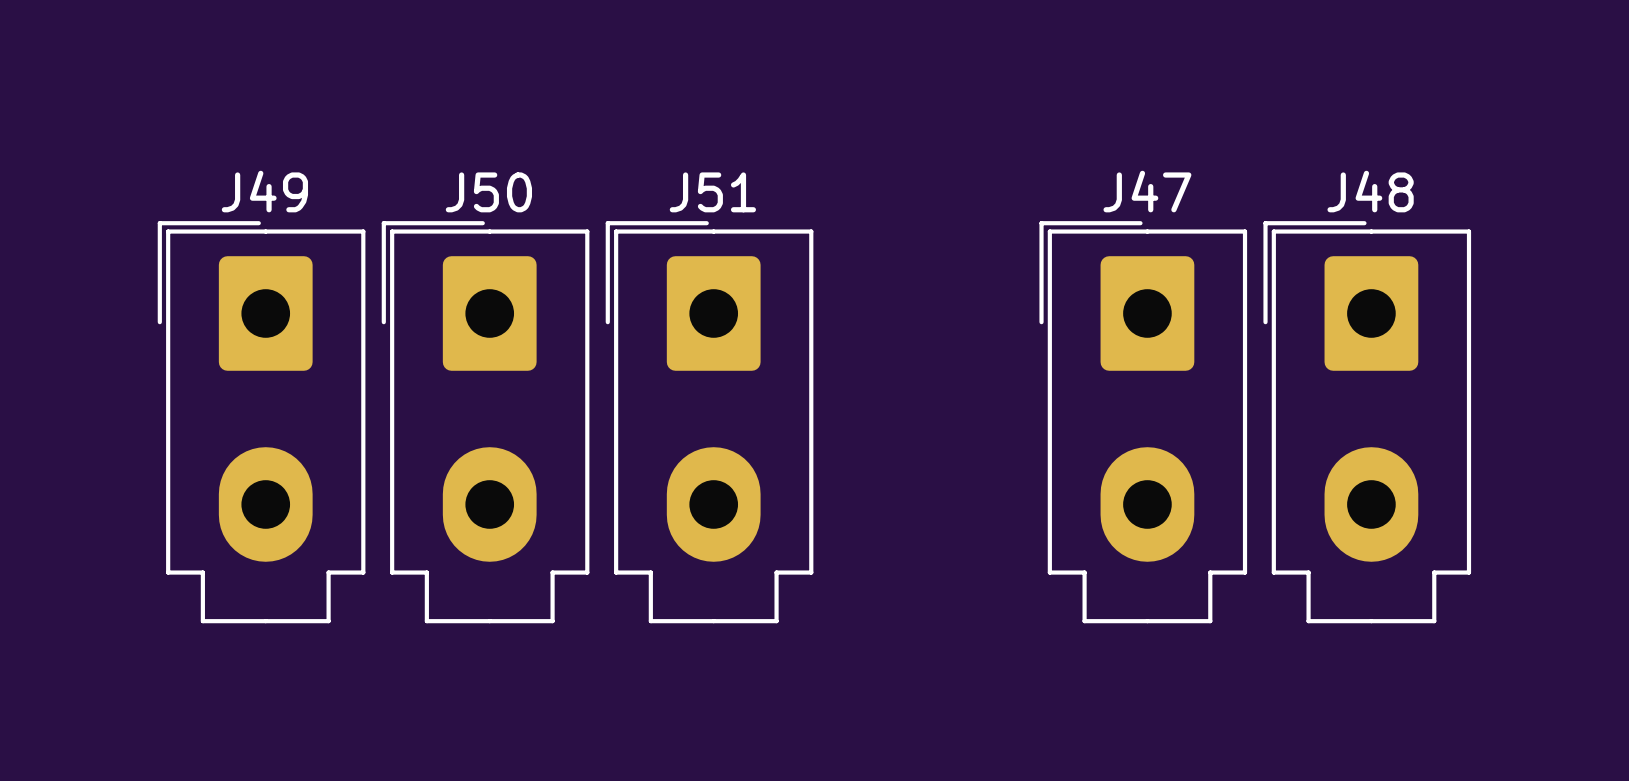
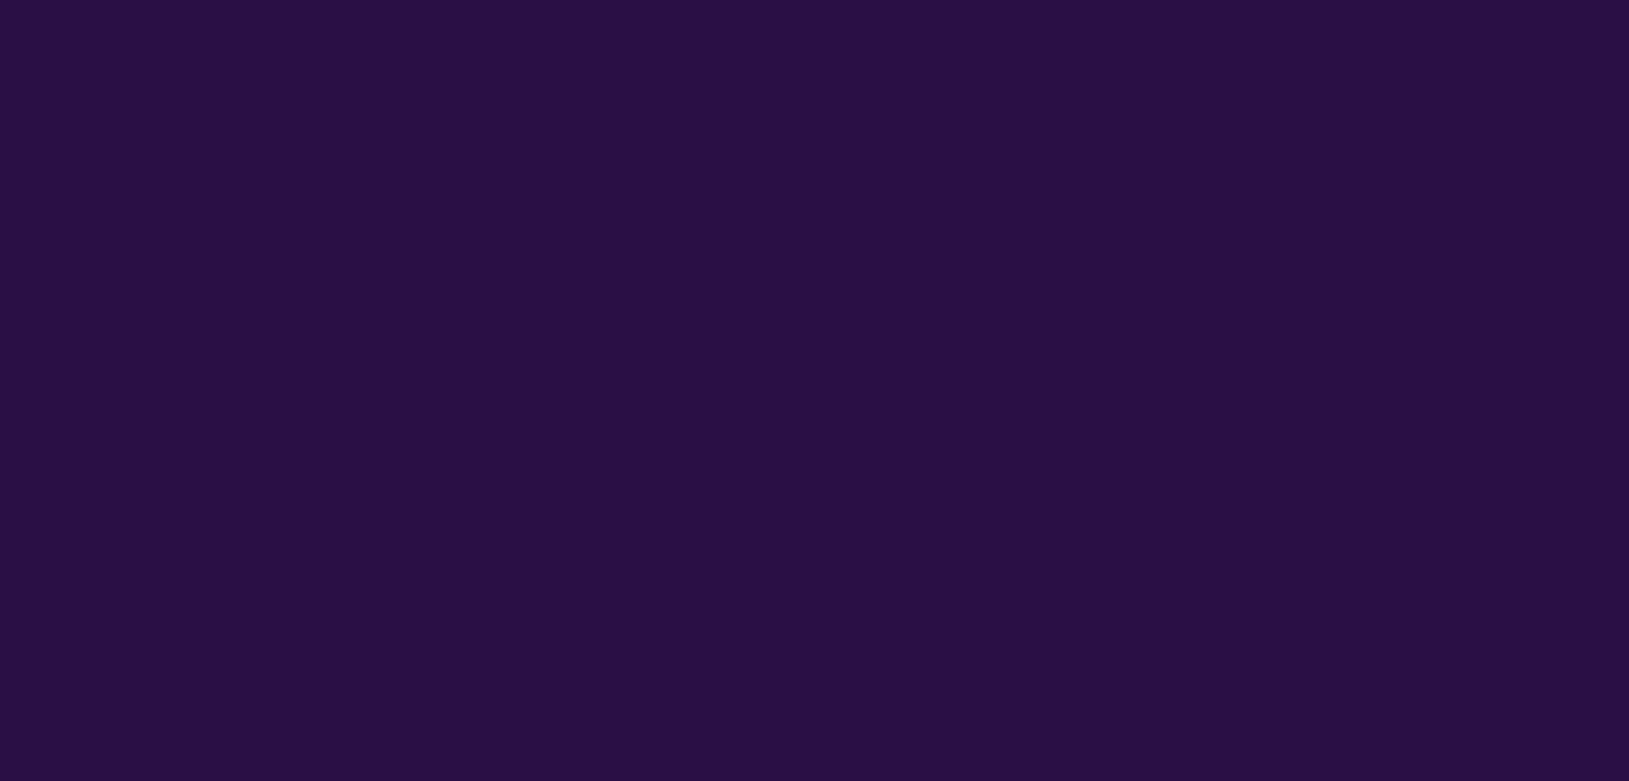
J49: (261, 422) -> none
J50: (485, 422) -> none
J51: (709, 422) -> none
J47: (1143, 422) -> none
J48: (1367, 422) -> none

